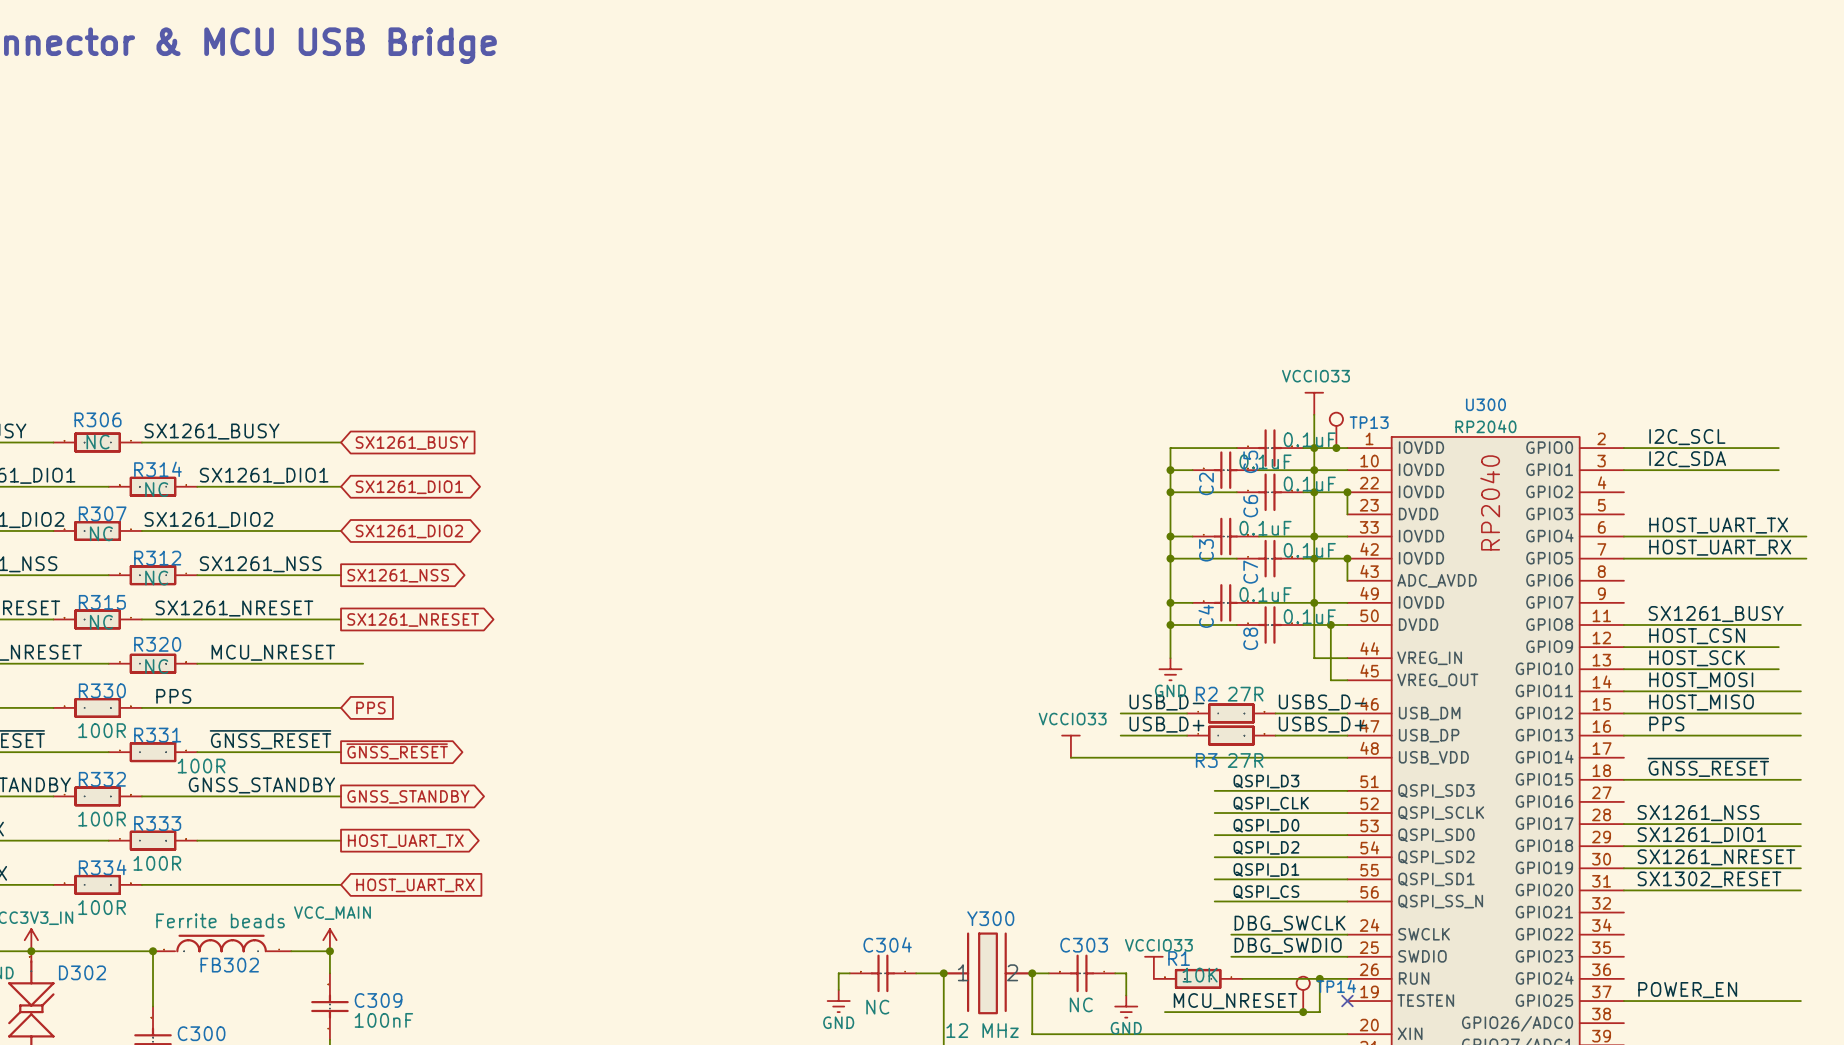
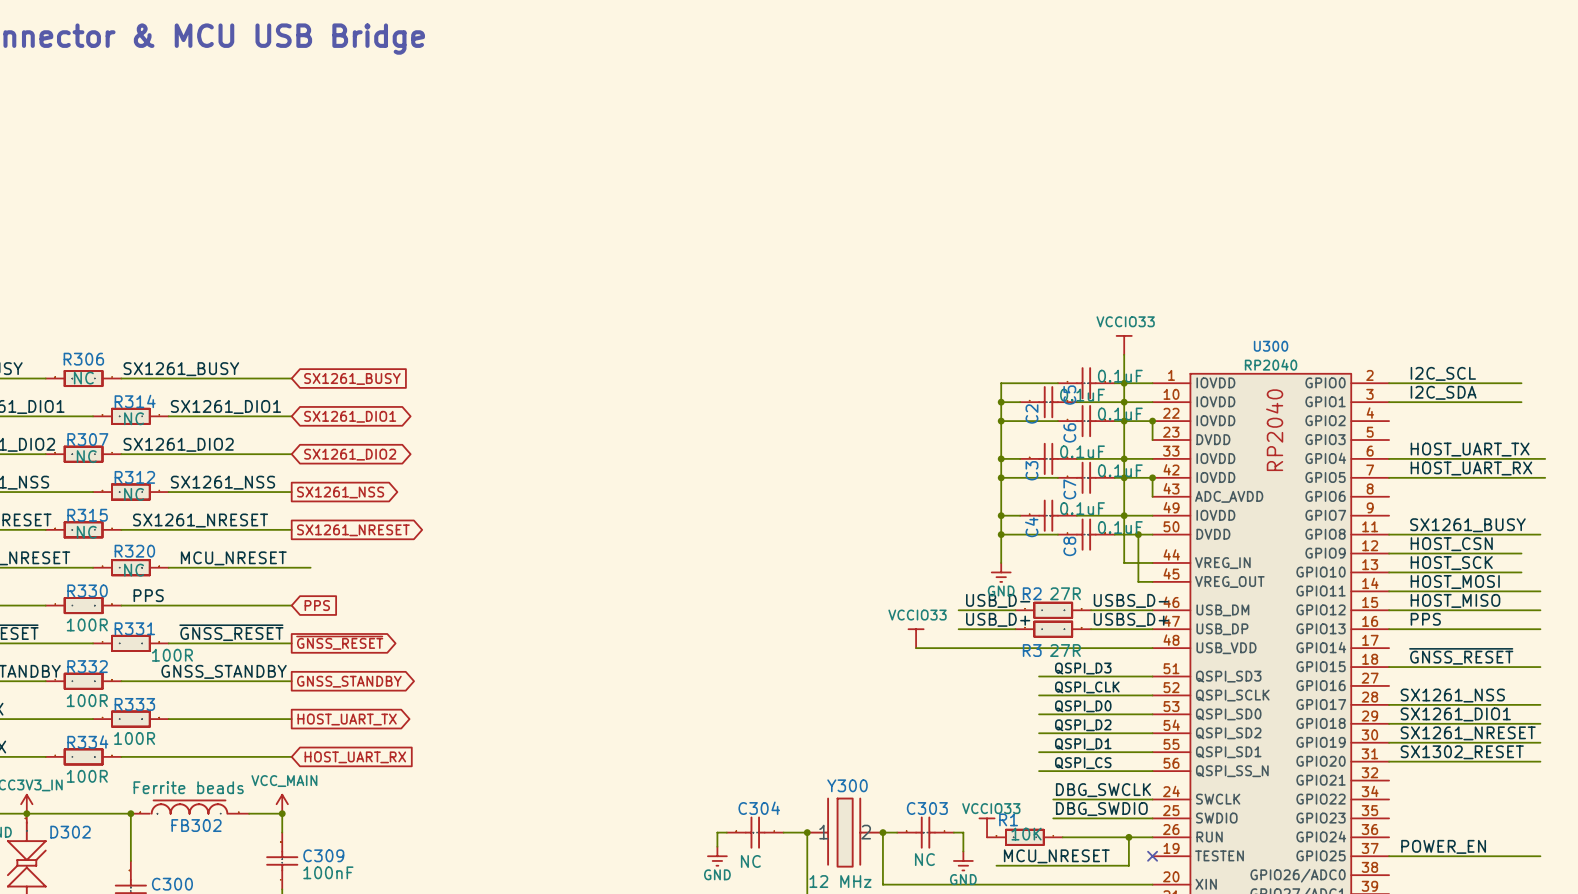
TP13: (1336, 430) -> none
junction: (1336, 448) -> none
TP14: (1303, 994) -> none
junction: (1303, 1012) -> none

